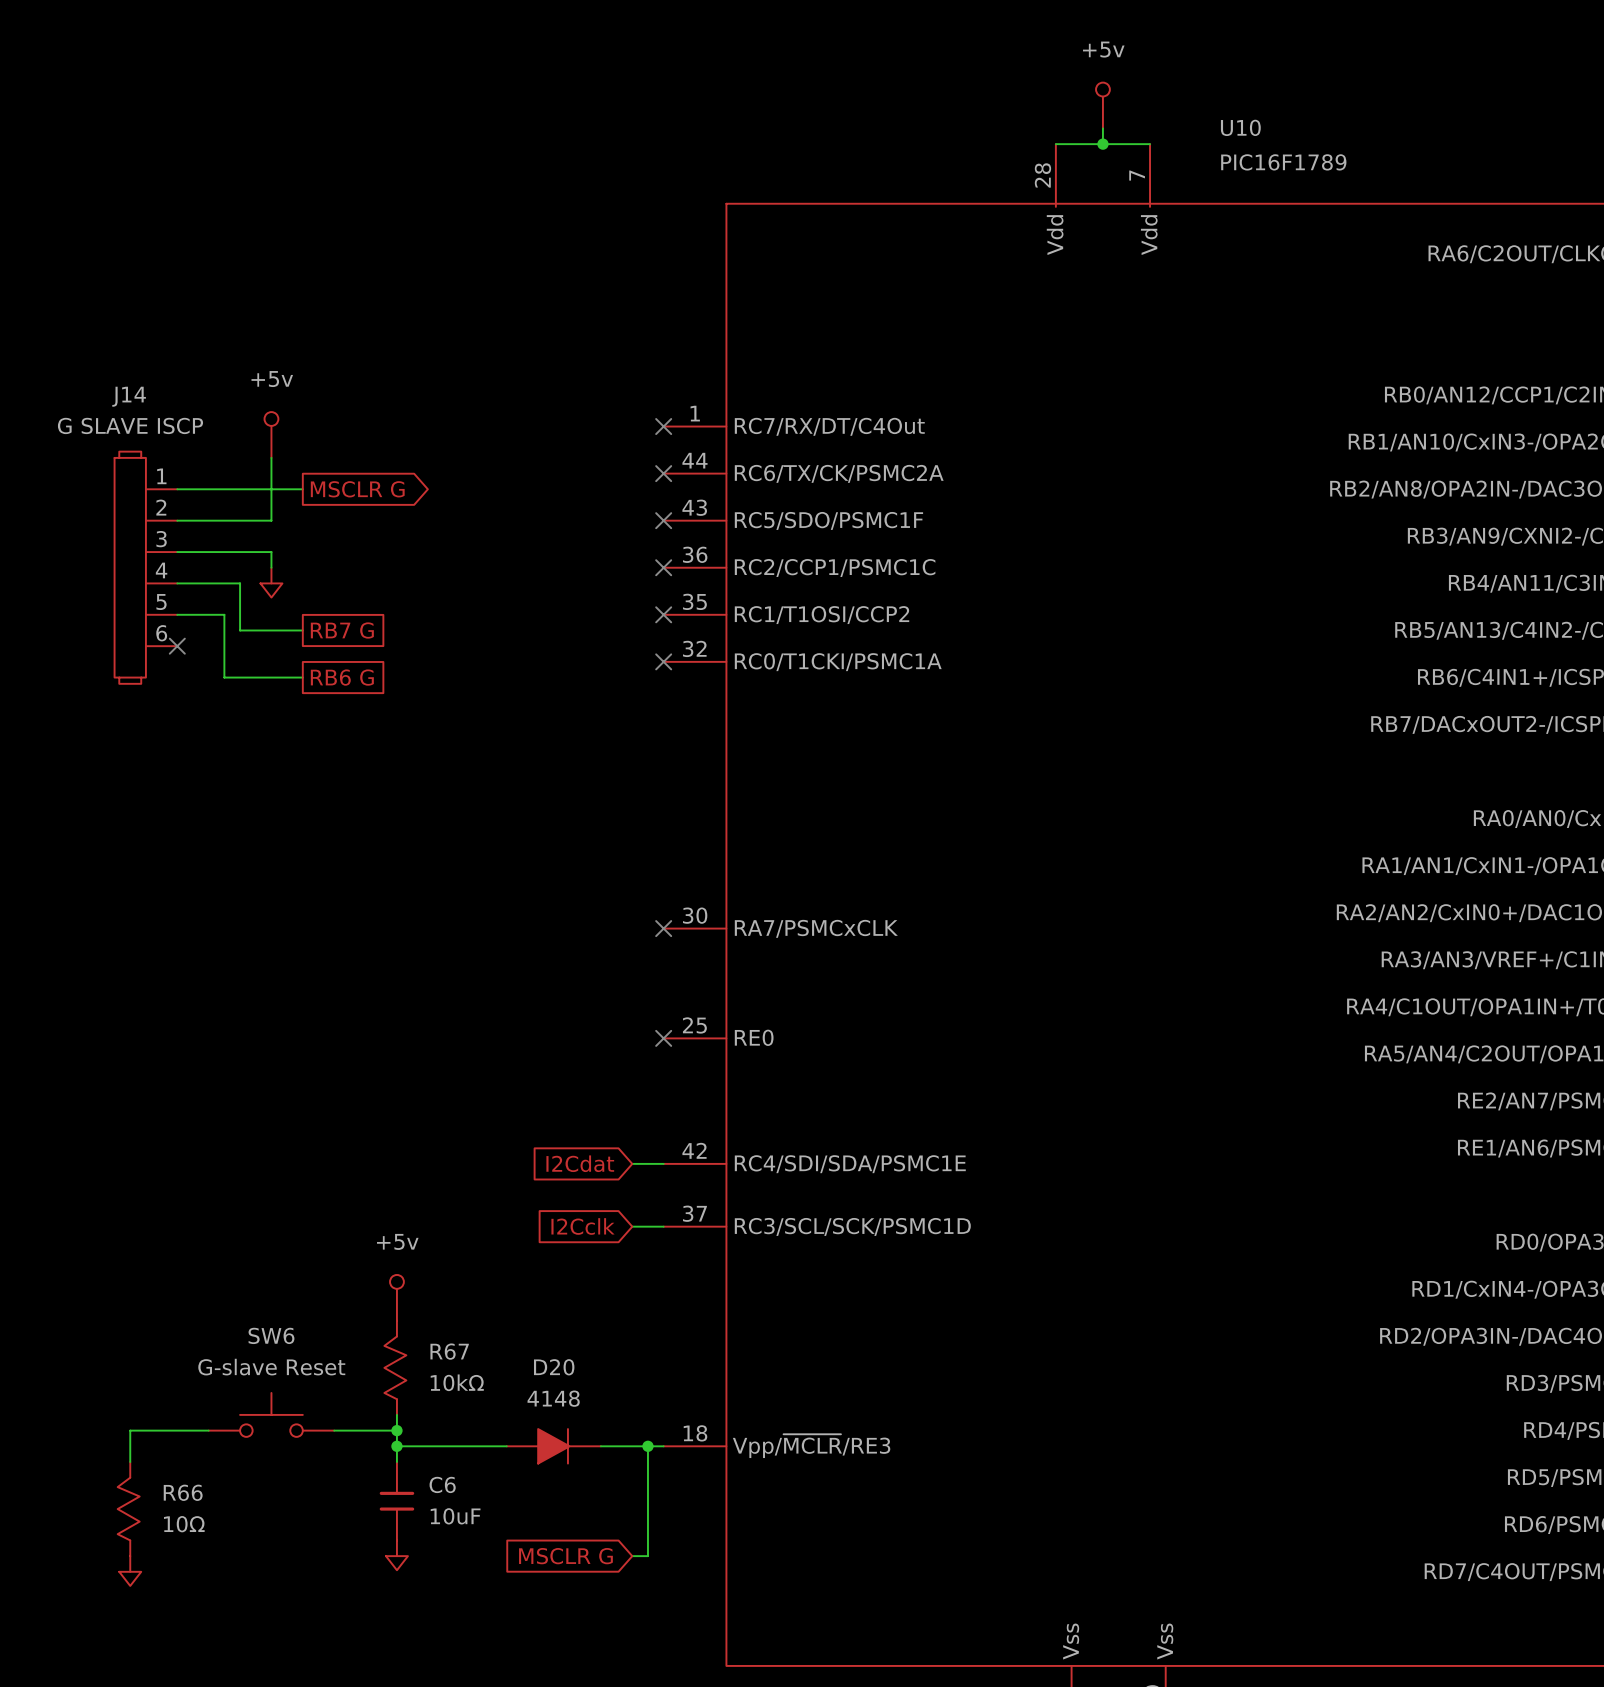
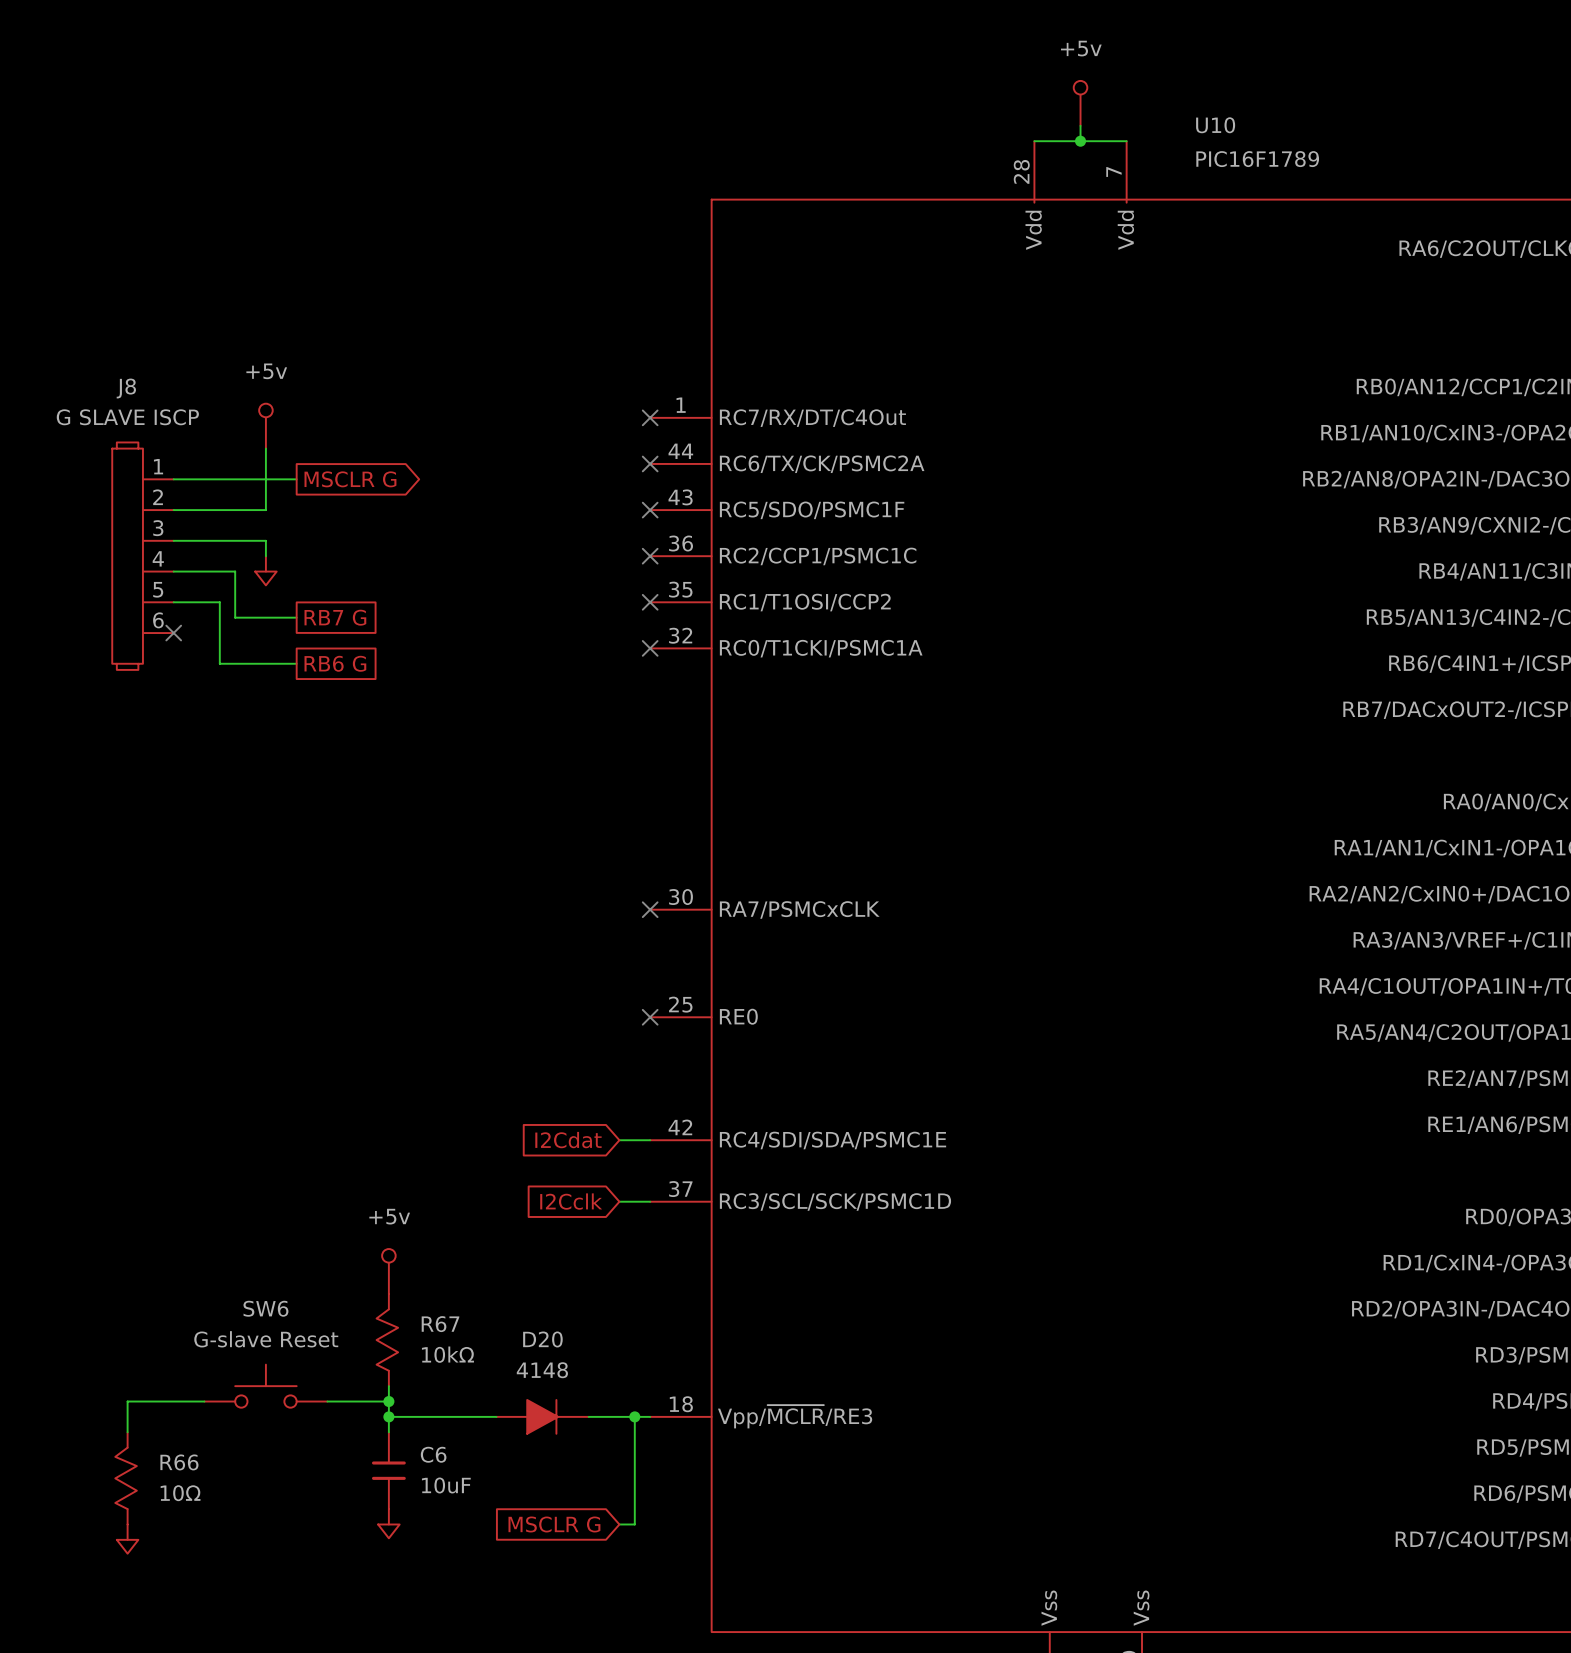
J14 name: J14 (129, 396) -> J8 (126, 388)

